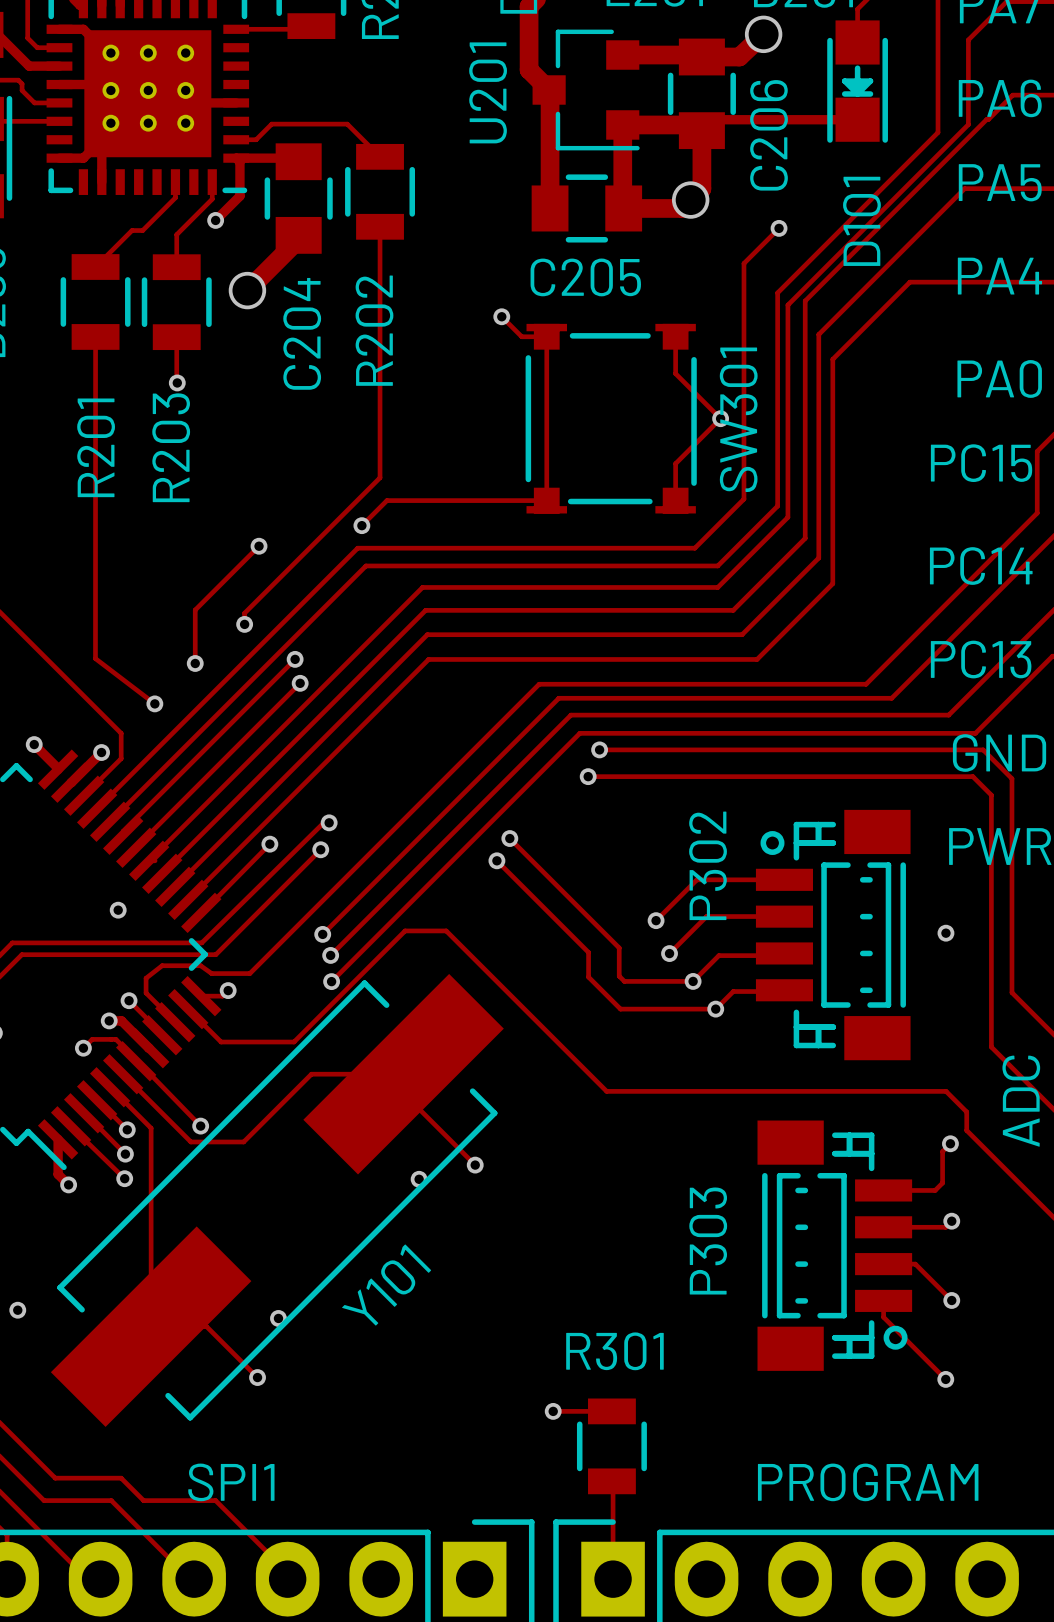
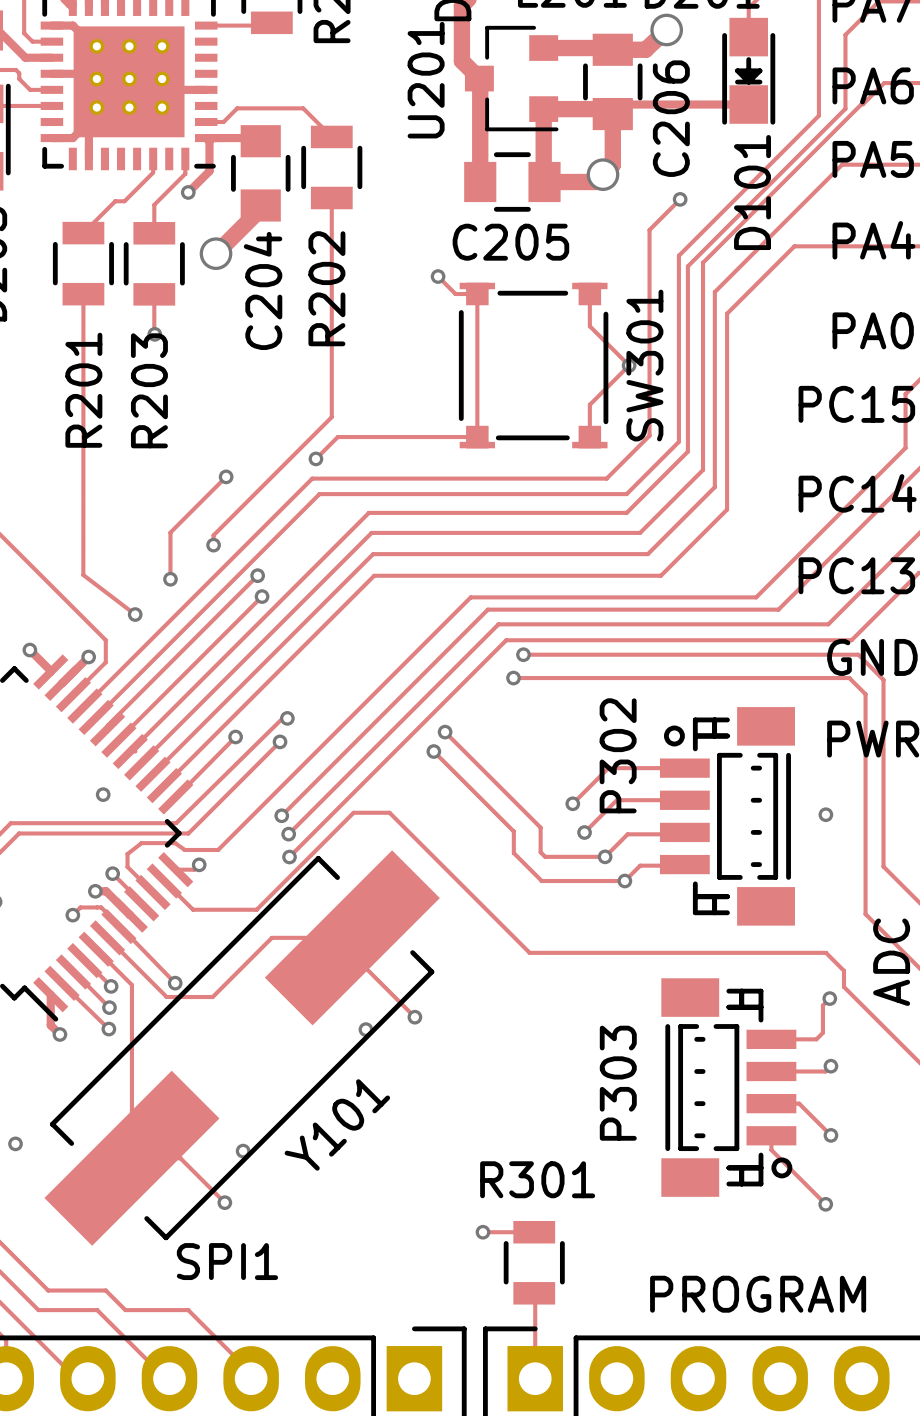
text position: SPI1 (231, 1482) -> SPI1 (227, 1261)

